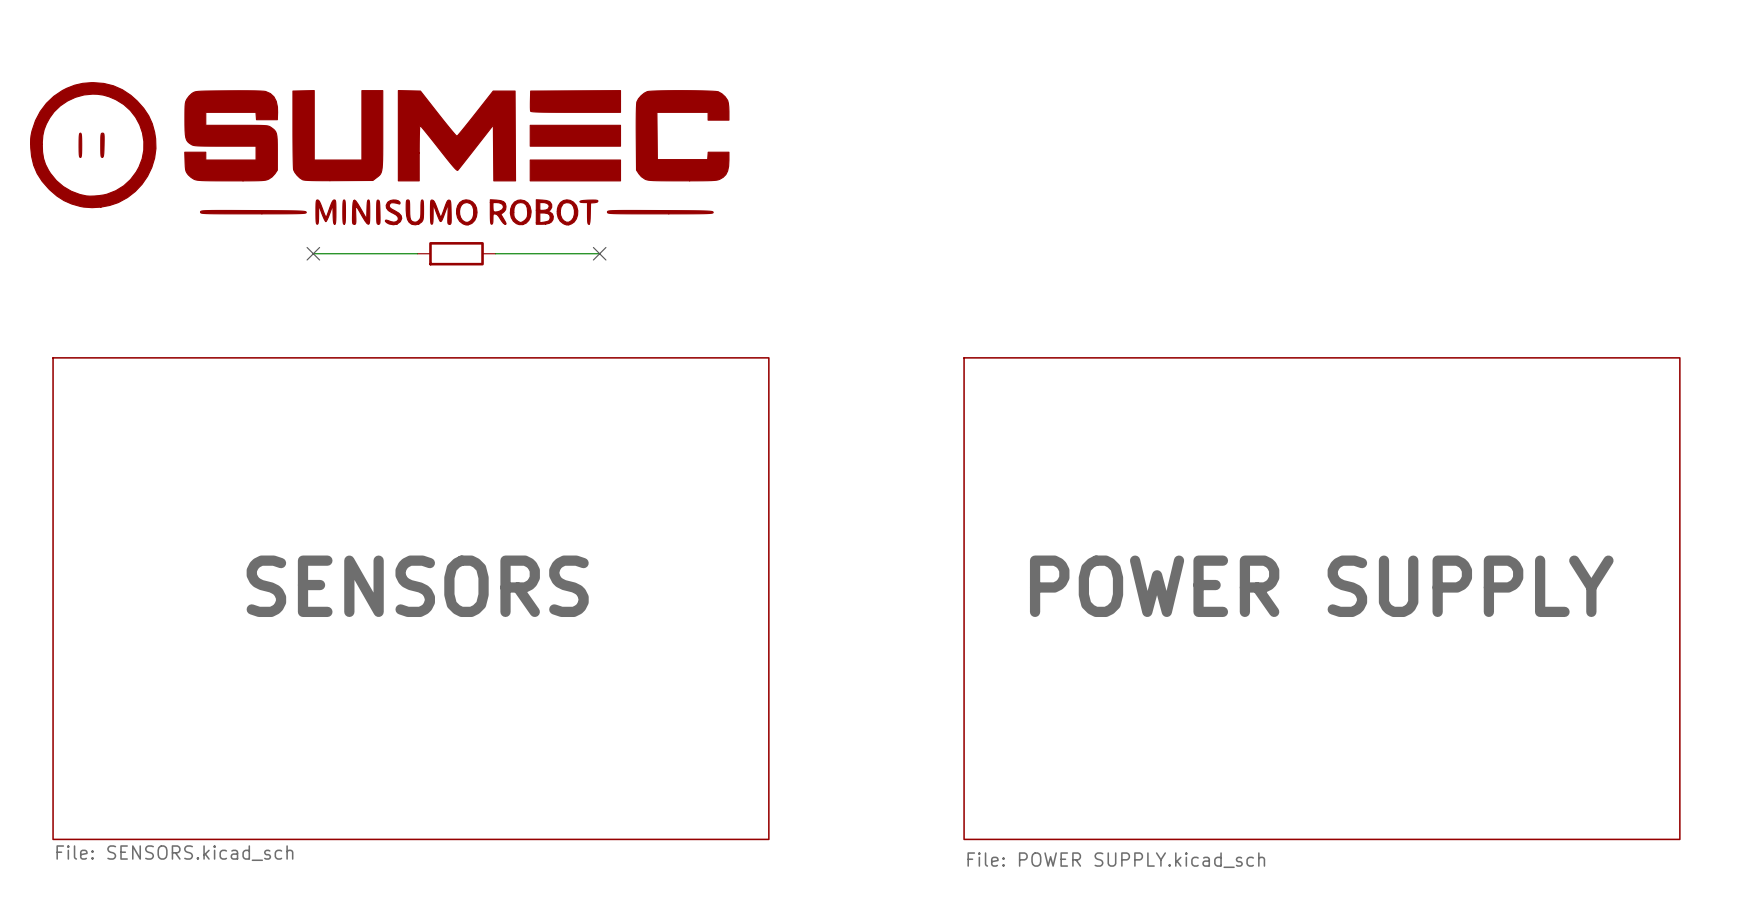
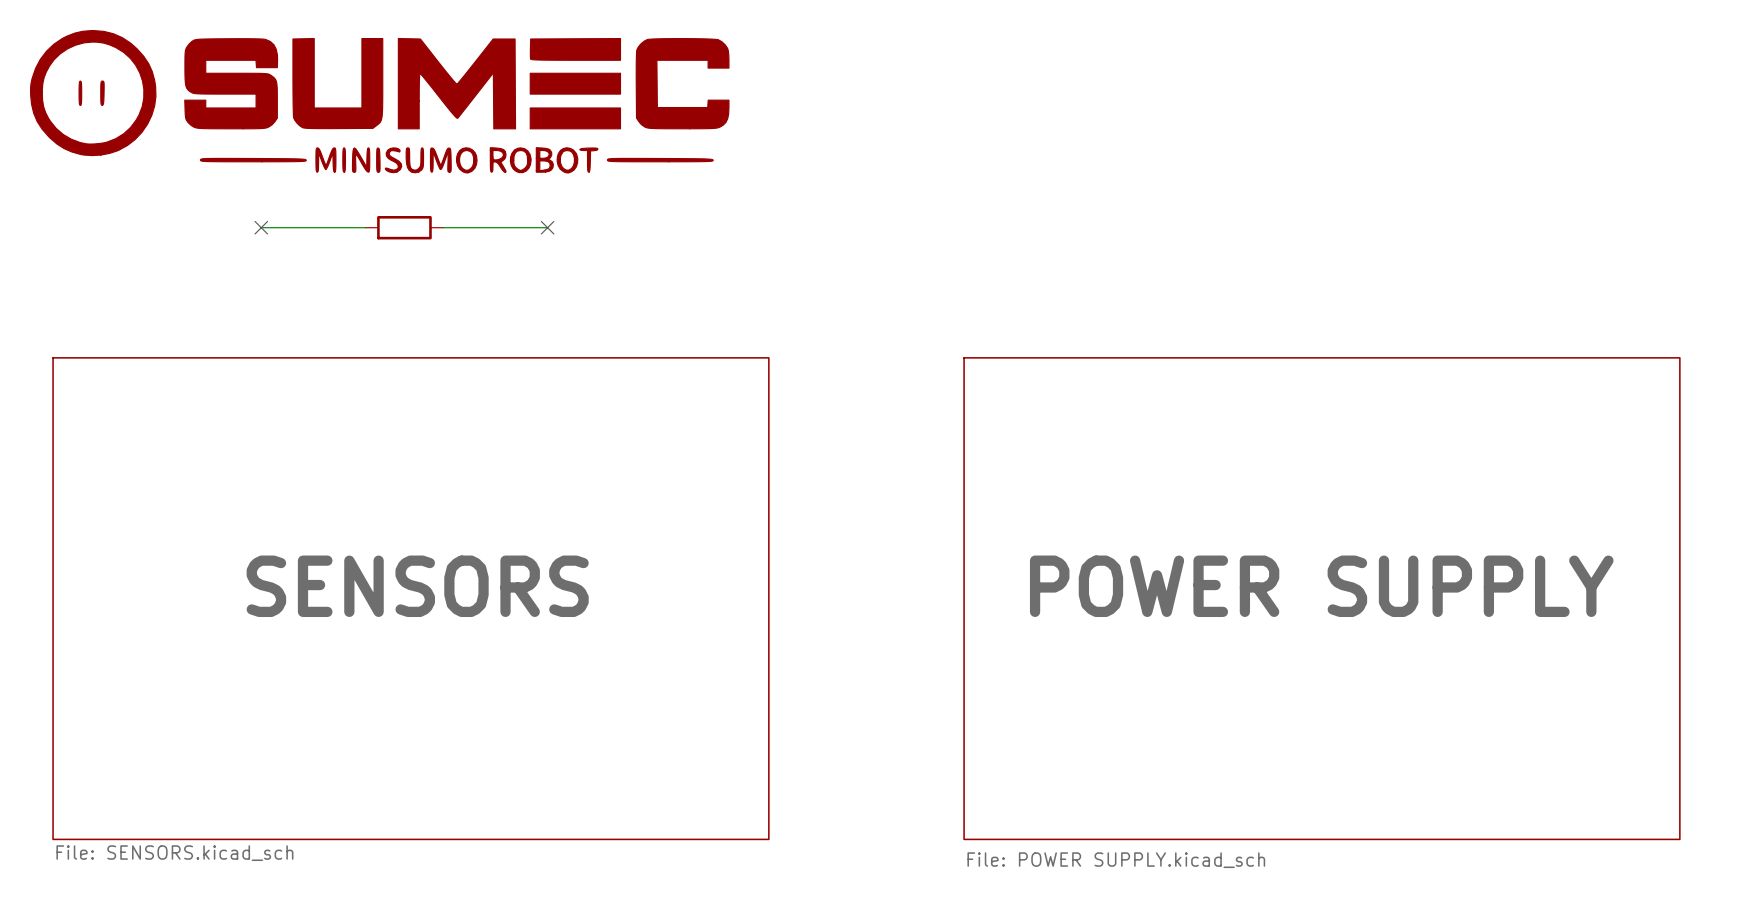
power symbol position: (379, 153) -> (379, 101)
wire: (313, 253) (417, 253) -> (261, 227) (365, 227)
no-connect mark position: (313, 253) -> (261, 227)
part position: (456, 253) -> (404, 227)
wire: (495, 253) (599, 253) -> (443, 227) (547, 227)
no-connect mark position: (599, 253) -> (547, 227)

